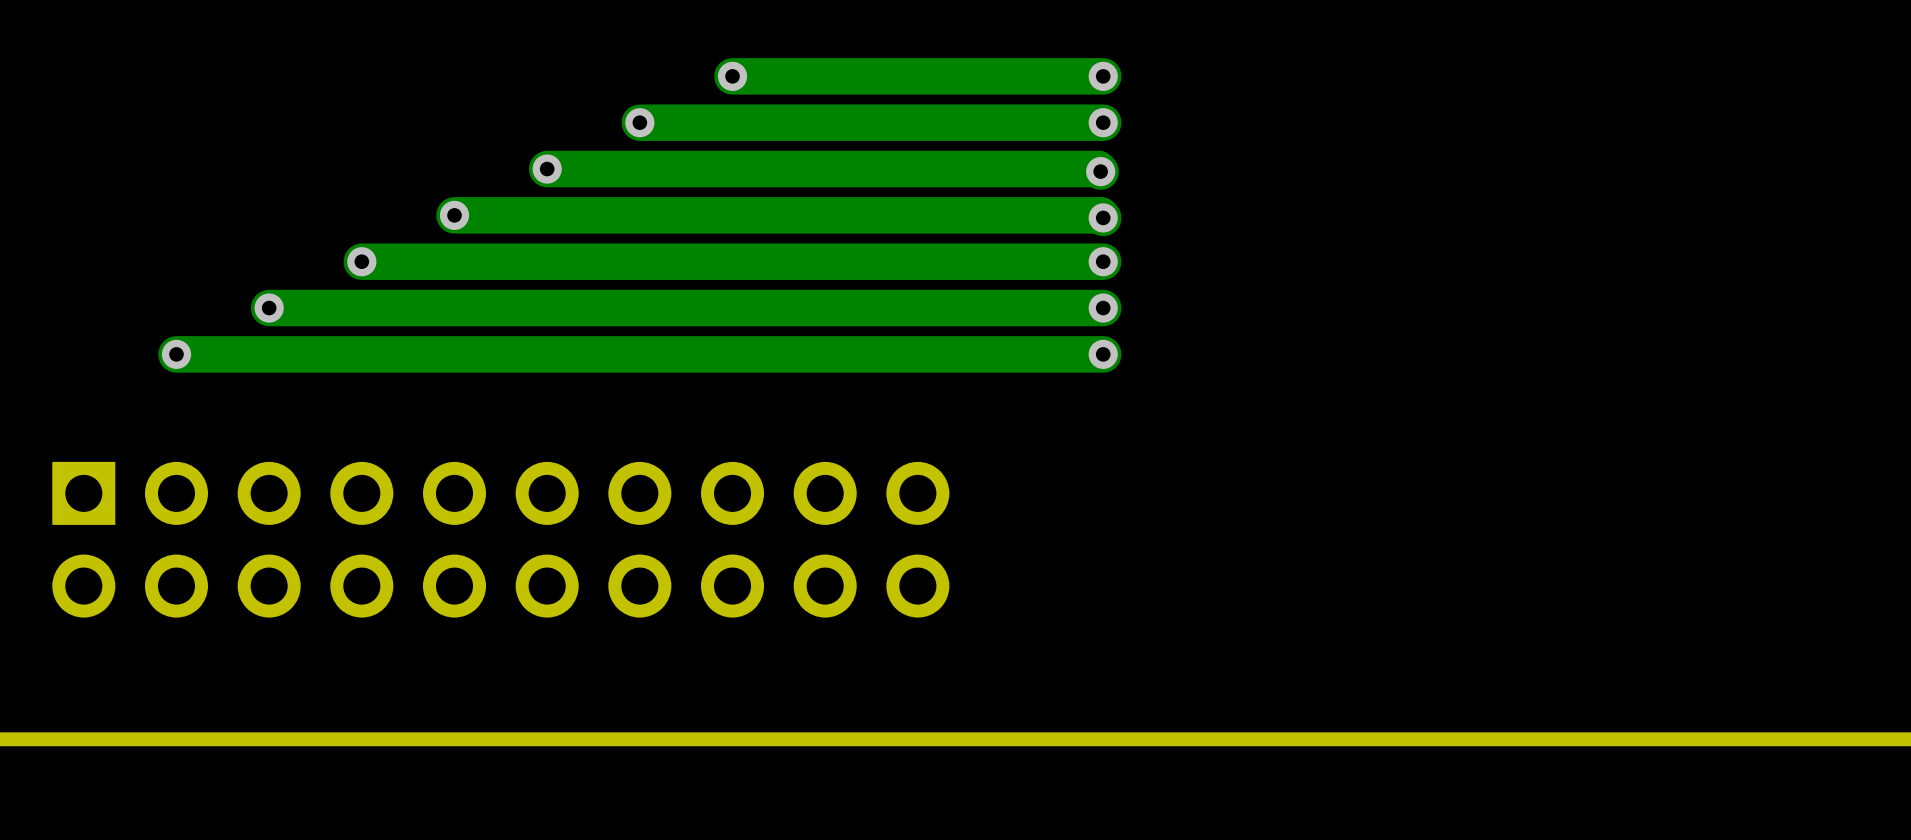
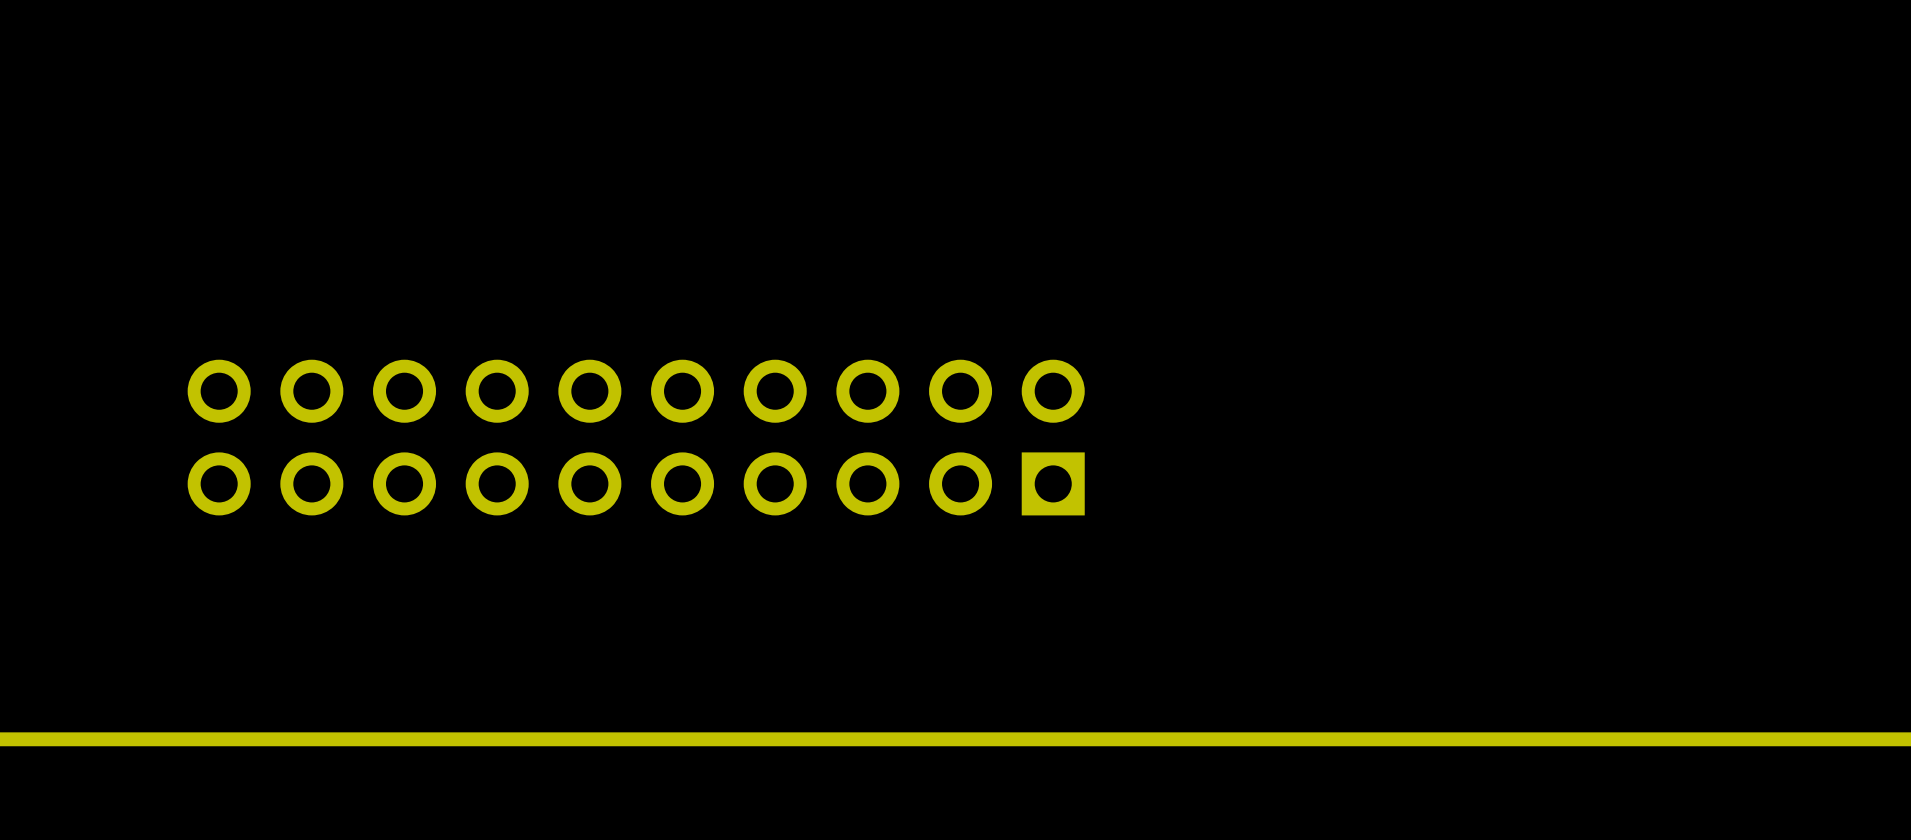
via: (732, 76) -> none
track: (1103, 76) (732, 76) -> none
via: (1103, 76) -> none
via: (639, 122) -> none
track: (1103, 122) (639, 122) -> none
via: (1103, 122) -> none
track: (547, 169) (1098, 169) (1100, 171) -> none
via: (547, 169) -> none
via: (1100, 171) -> none
track: (454, 215) (1100, 215) (1103, 217) -> none
via: (454, 215) -> none
via: (1103, 217) -> none
via: (361, 261) -> none
track: (1103, 261) (361, 261) -> none
via: (1103, 261) -> none
via: (269, 308) -> none
track: (1103, 308) (269, 308) -> none
via: (1103, 308) -> none
via: (176, 354) -> none
track: (1103, 354) (176, 354) -> none
via: (1103, 354) -> none
part rotation: 0° (500, 539) -> 180° (636, 437)

